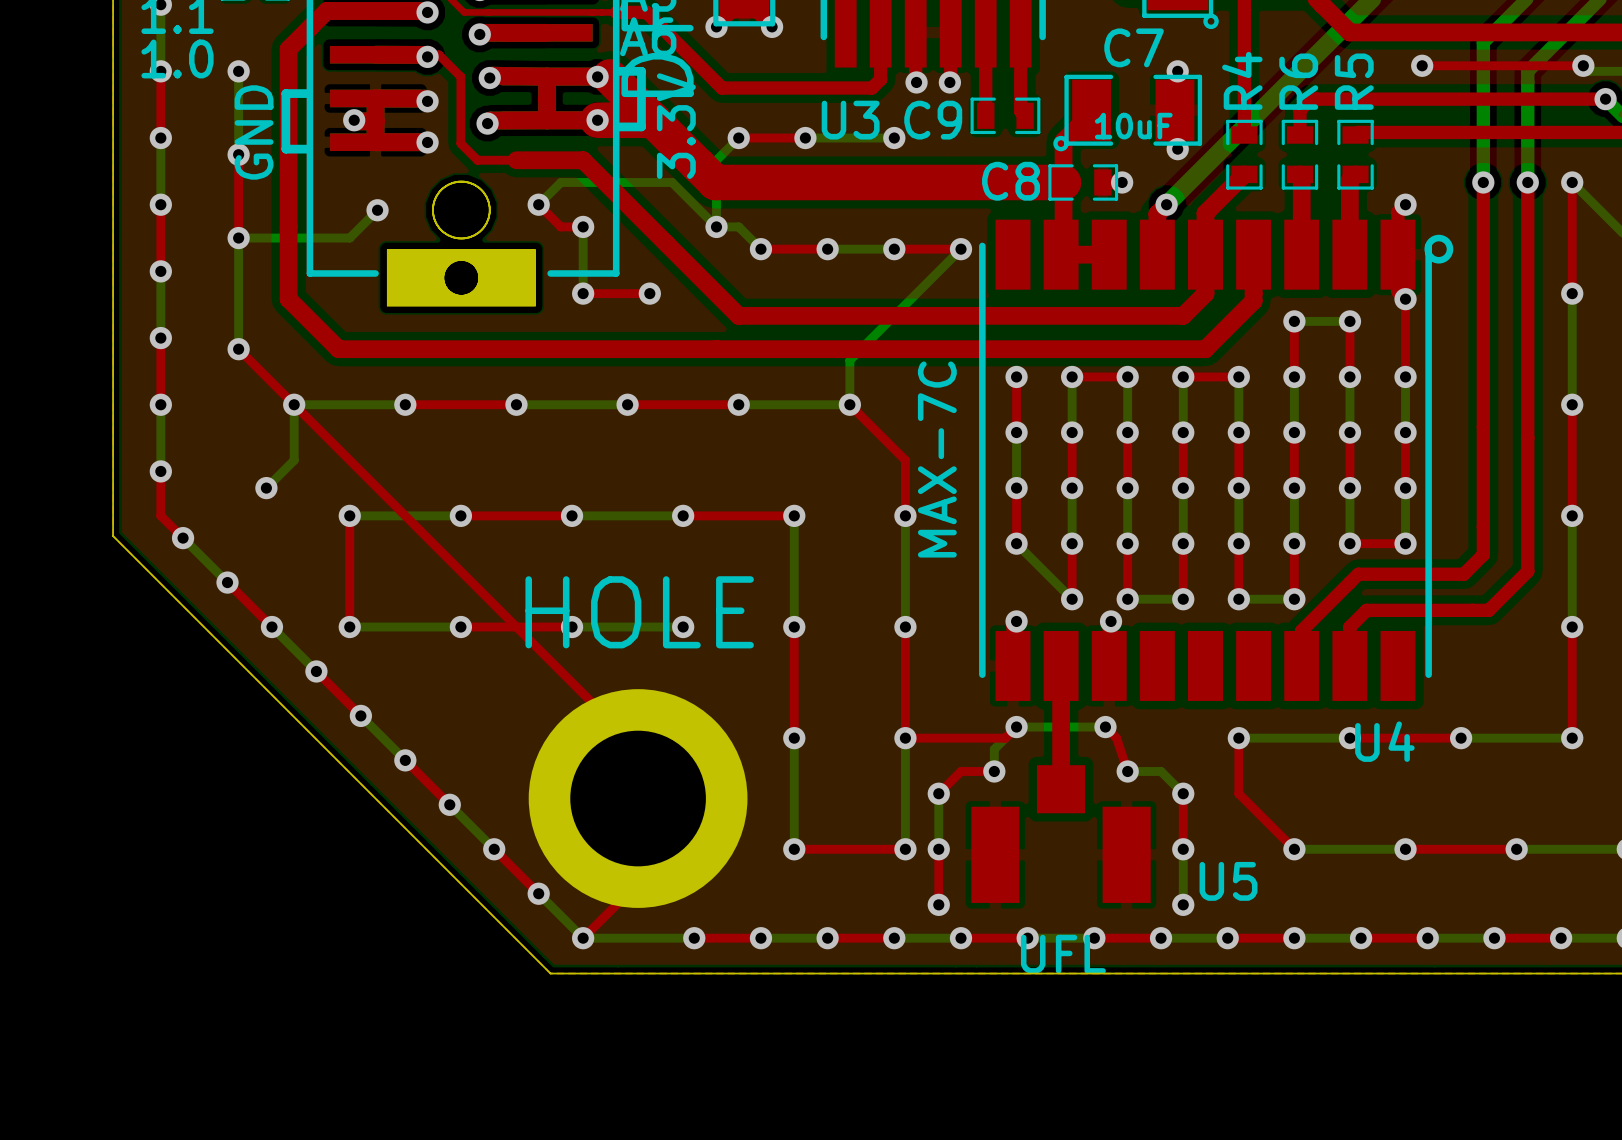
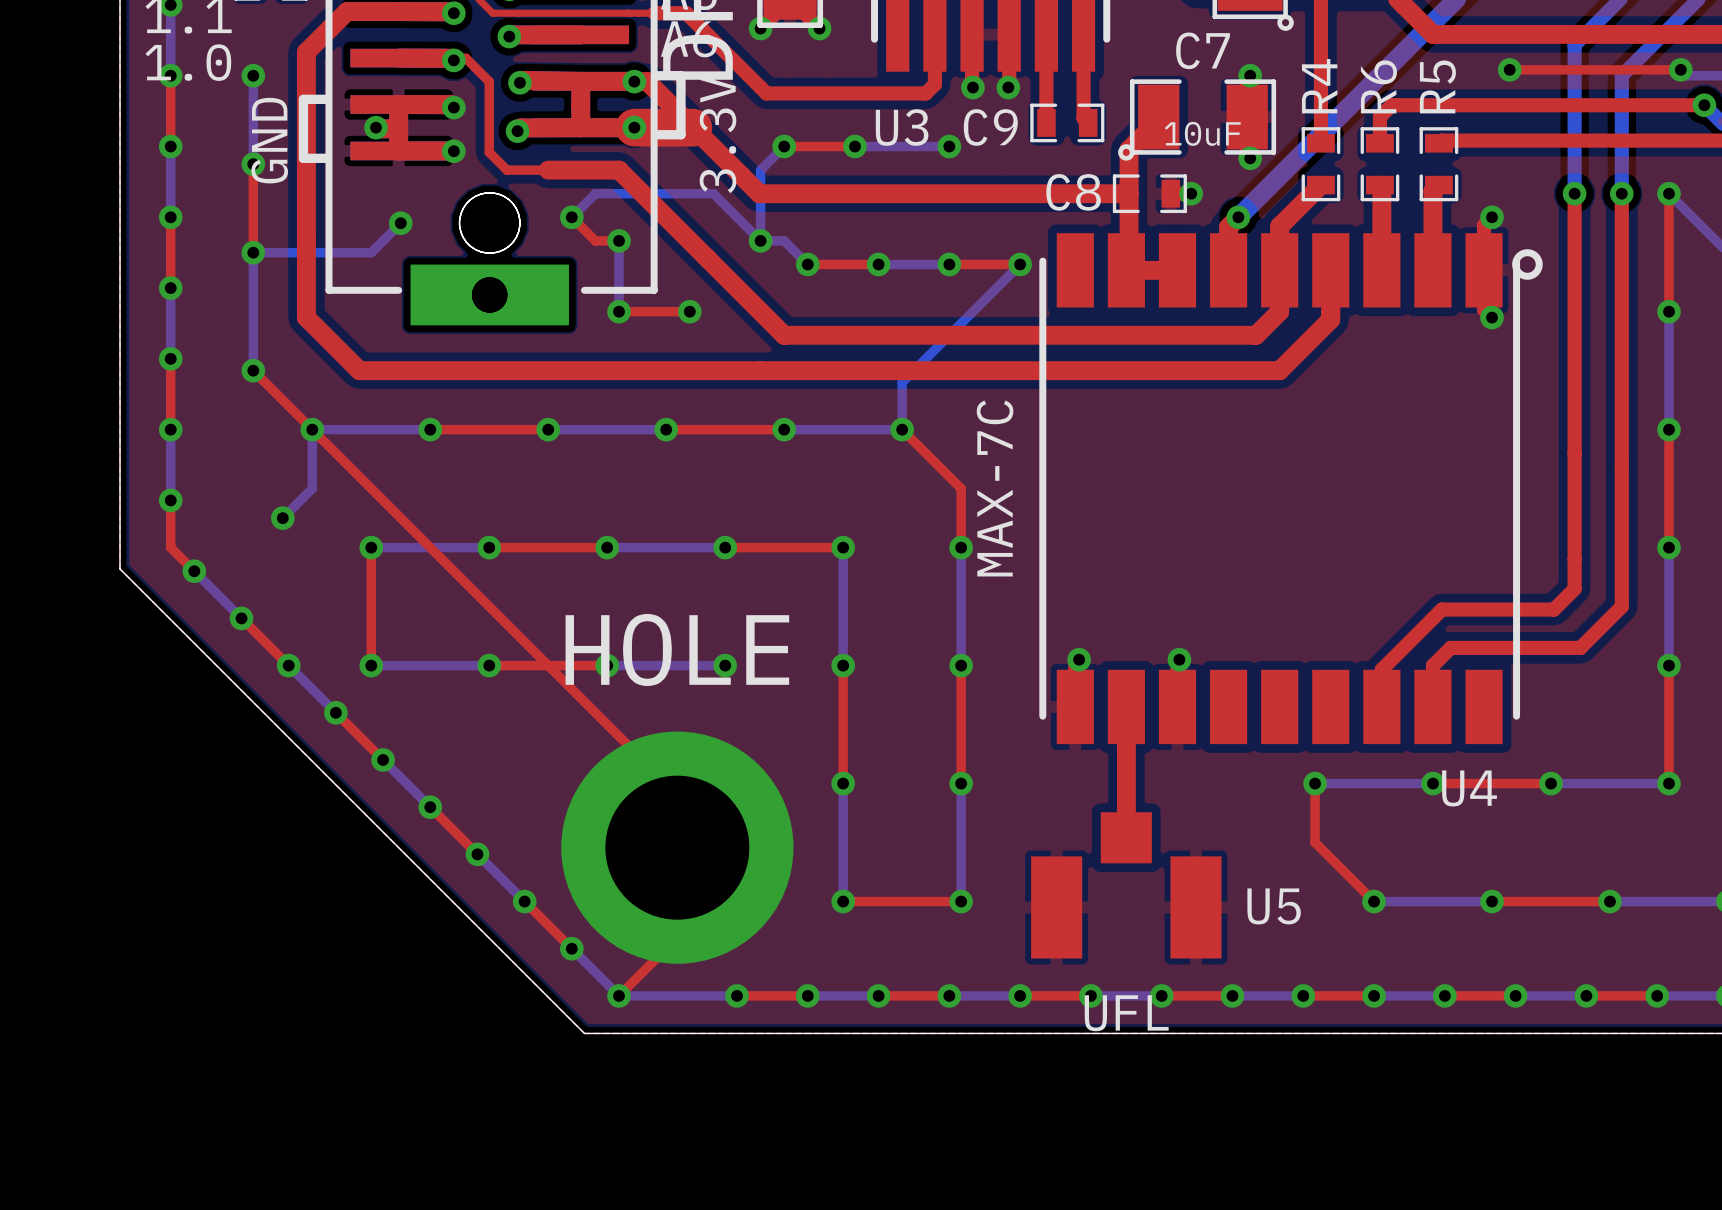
top track width: thick (609, 76) (715, 182) (1063, 182) -> thin (647, 81) (759, 193) (1129, 193)
top track: (1405, 299) (1405, 376) -> none
top track: (1294, 321) (1294, 376) -> none
bottom track: (1294, 321) (1349, 321) -> none
via: (1294, 321) -> none
top track: (1349, 321) (1349, 376) -> none
via: (1349, 321) -> none
top track: (1016, 376) (1016, 432) -> none
via: (1016, 376) -> none
top track: (1072, 376) (1127, 376) -> none
bottom track: (1072, 376) (1072, 432) -> none
via: (1072, 376) -> none
bottom track: (1127, 376) (1127, 432) -> none
via: (1127, 376) -> none
top track: (1183, 376) (1238, 376) -> none
bottom track: (1183, 376) (1183, 432) -> none
via: (1183, 376) -> none
bottom track: (1238, 376) (1238, 432) -> none
via: (1238, 376) -> none
bottom track: (1294, 376) (1294, 432) -> none
via: (1294, 376) -> none
bottom track: (1349, 376) (1349, 432) -> none
via: (1349, 376) -> none
bottom track: (1405, 376) (1405, 432) -> none
via: (1405, 376) -> none
bottom track: (1016, 432) (1016, 488) -> none
via: (1016, 432) -> none
top track: (1072, 432) (1072, 488) -> none
via: (1072, 432) -> none
top track: (1127, 432) (1127, 488) -> none
via: (1127, 432) -> none
top track: (1183, 432) (1183, 488) -> none
via: (1183, 432) -> none
top track: (1238, 432) (1238, 488) -> none
via: (1238, 432) -> none
top track: (1294, 432) (1294, 488) -> none
via: (1294, 432) -> none
top track: (1349, 432) (1349, 488) -> none
via: (1349, 432) -> none
top track: (1405, 432) (1405, 488) -> none
via: (1405, 432) -> none
top track: (1016, 488) (1016, 543) -> none
via: (1016, 488) -> none
bottom track: (1072, 488) (1072, 543) -> none
via: (1072, 488) -> none
bottom track: (1127, 488) (1127, 543) -> none
via: (1127, 488) -> none
bottom track: (1183, 488) (1183, 543) -> none
via: (1183, 488) -> none
bottom track: (1238, 488) (1238, 543) -> none
via: (1238, 488) -> none
bottom track: (1294, 488) (1294, 543) -> none
via: (1294, 488) -> none
bottom track: (1349, 488) (1349, 543) -> none
via: (1349, 488) -> none
bottom track: (1405, 488) (1405, 543) -> none
via: (1405, 488) -> none
bottom track: (1016, 543) (1072, 599) -> none
via: (1016, 543) -> none
top track: (1072, 543) (1072, 599) -> none
via: (1072, 543) -> none
top track: (1127, 543) (1127, 599) -> none
via: (1127, 543) -> none
top track: (1183, 543) (1183, 599) -> none
via: (1183, 543) -> none
top track: (1238, 543) (1238, 599) -> none
via: (1238, 543) -> none
top track: (1294, 543) (1294, 599) -> none
via: (1294, 543) -> none
top track: (1349, 543) (1405, 543) -> none
via: (1349, 543) -> none
via: (1405, 543) -> none
via: (1072, 599) -> none
bottom track: (1127, 599) (1183, 599) -> none
via: (1127, 599) -> none
via: (1183, 599) -> none
bottom track: (1238, 599) (1294, 599) -> none
via: (1238, 599) -> none
via: (1294, 599) -> none
top track: (1016, 727) (1005, 738) (905, 738) -> none
via: (1016, 727) -> none
top track: (1105, 727) (1116, 738) (1127, 771) -> none
bottom track: (1105, 727) (1016, 727) (994, 749) (994, 771) -> none
via: (1105, 727) -> none
top track: (994, 771) (961, 771) (938, 793) -> none
via: (994, 771) -> none
bottom track: (1127, 771) (1161, 771) (1183, 793) -> none
via: (1127, 771) -> none
bottom track: (938, 793) (938, 849) -> none
via: (938, 793) -> none
top track: (1183, 793) (1183, 849) -> none
via: (1183, 793) -> none
top track: (938, 849) (938, 904) -> none
via: (938, 849) -> none
bottom track: (1183, 849) (1183, 904) -> none
via: (1183, 849) -> none
U5 name position: U5 (1228, 881) -> U5 (1274, 906)
via: (938, 904) -> none
via: (1183, 904) -> none

